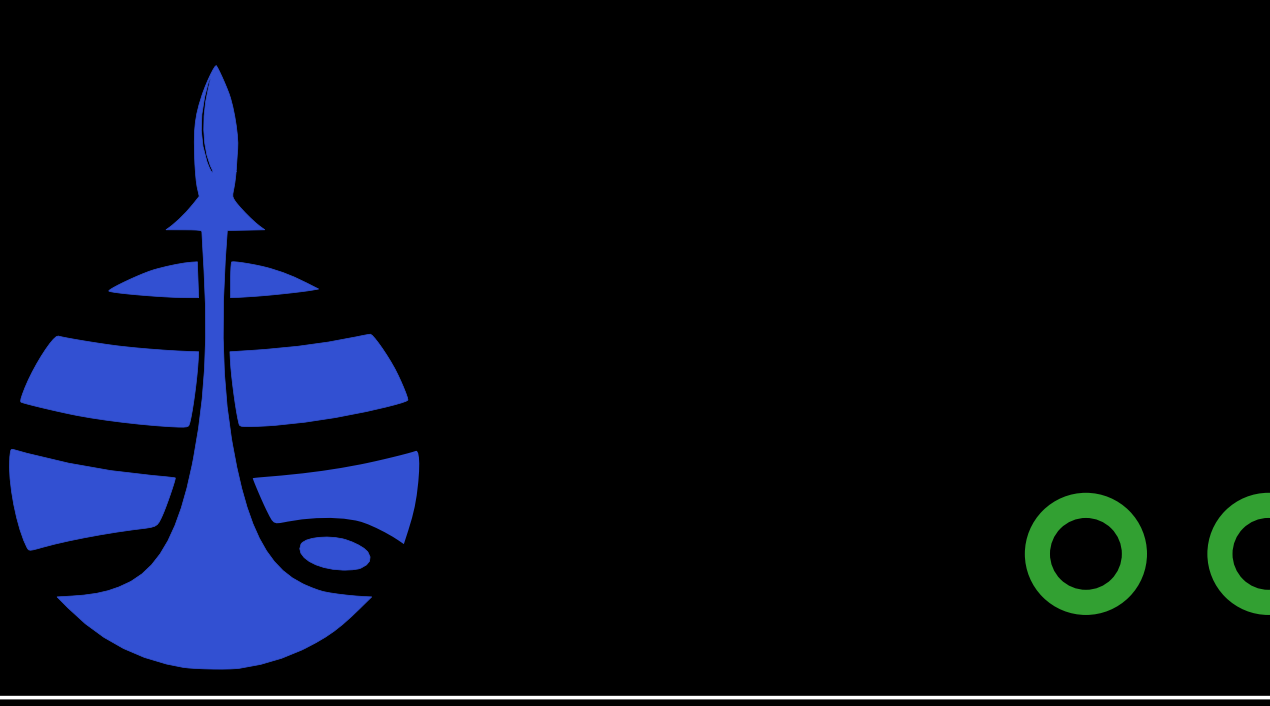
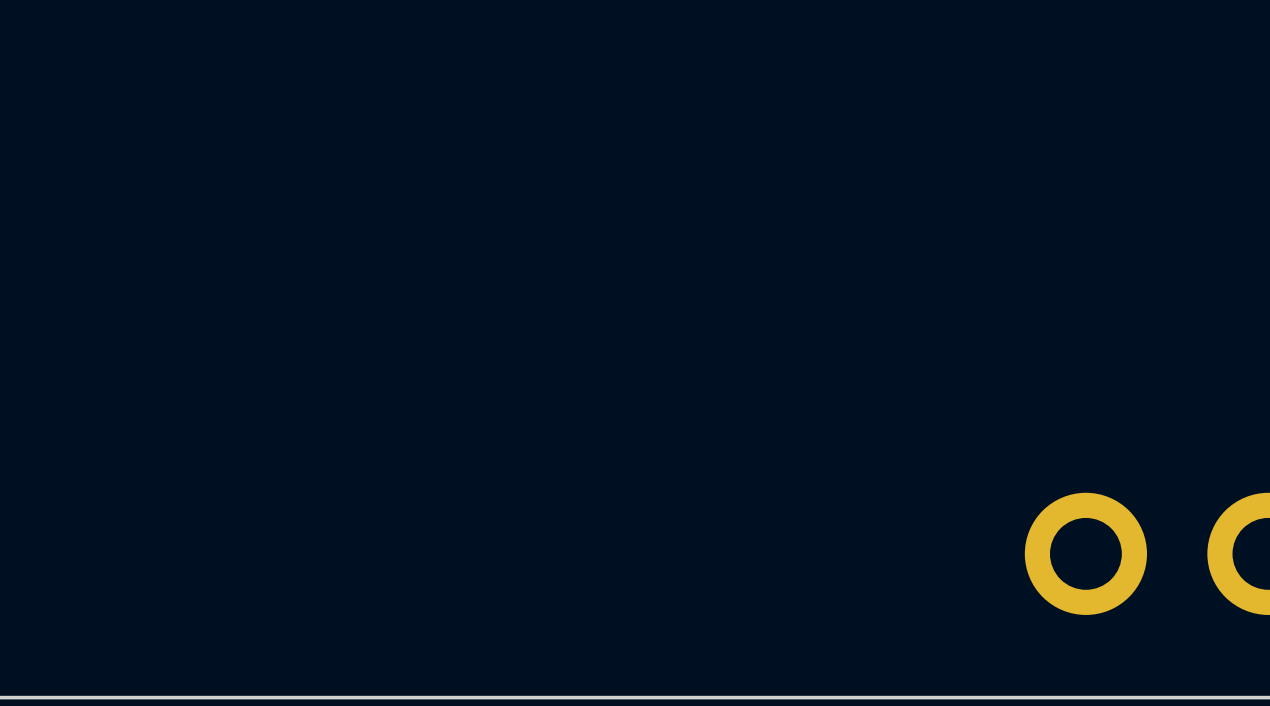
drawing: [9, 65, 420, 670] -> none

